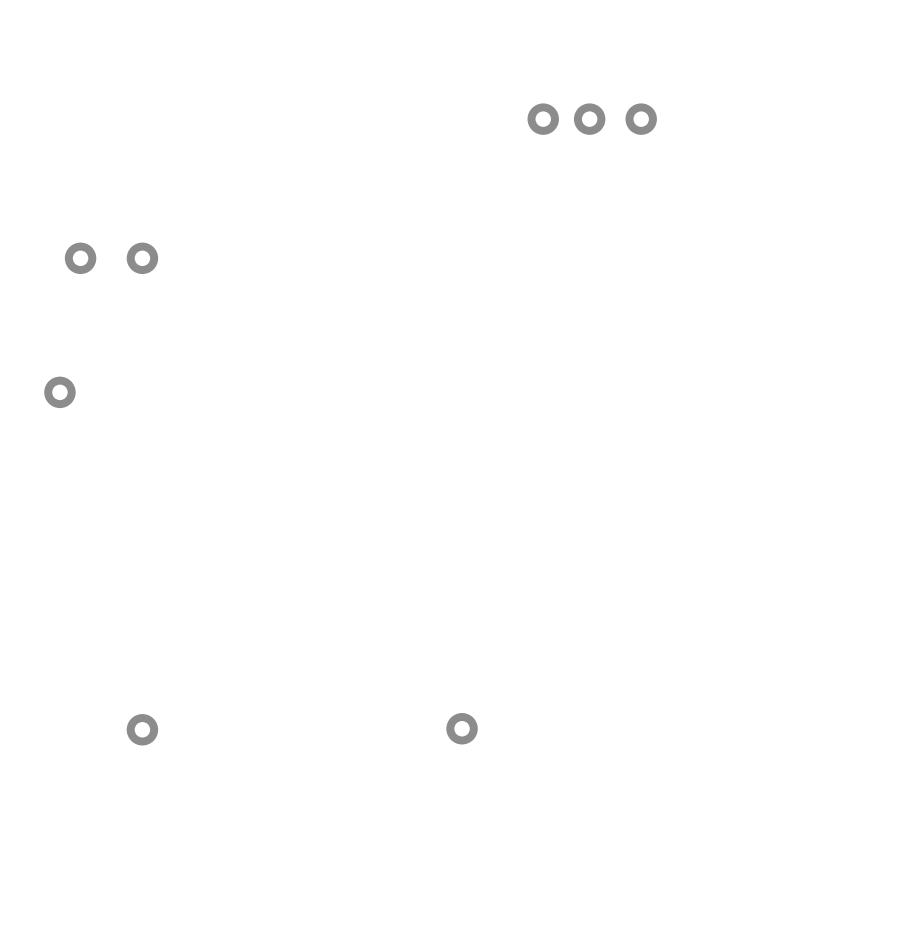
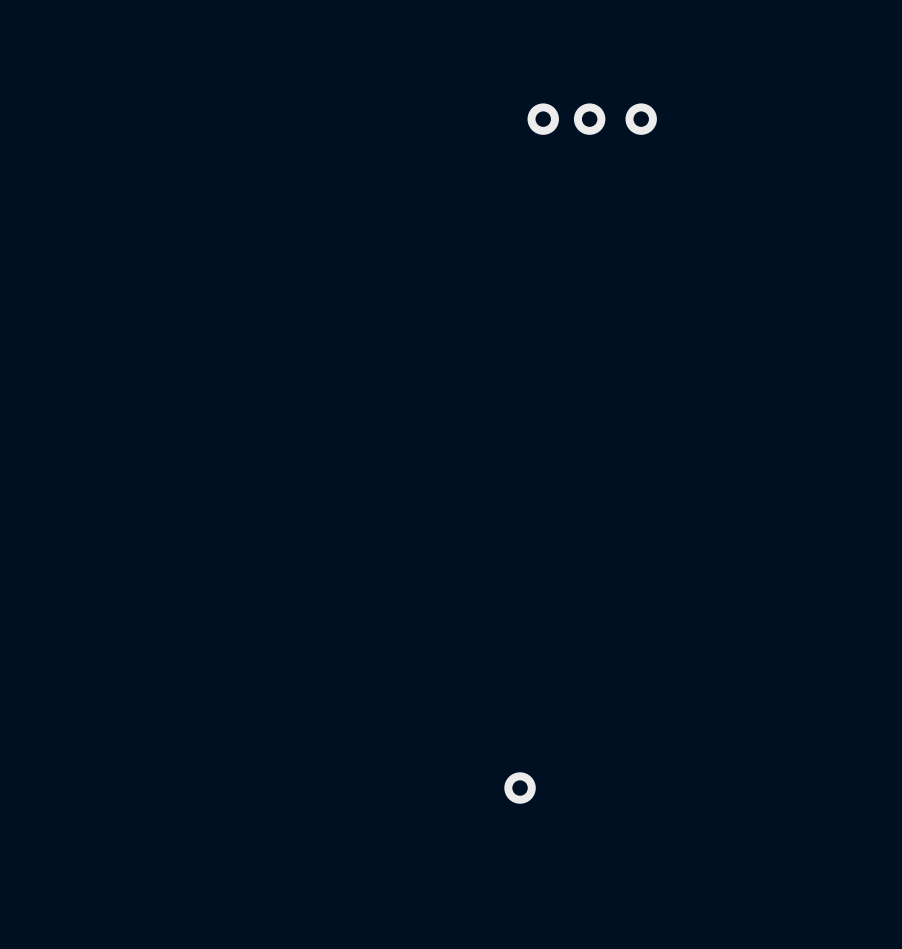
via: (80, 258) -> none
via: (142, 258) -> none
via: (59, 392) -> none
via position: (462, 728) -> (520, 788)
via: (142, 729) -> none

